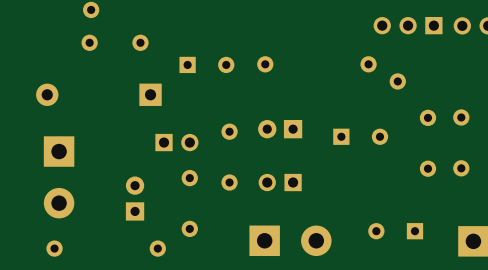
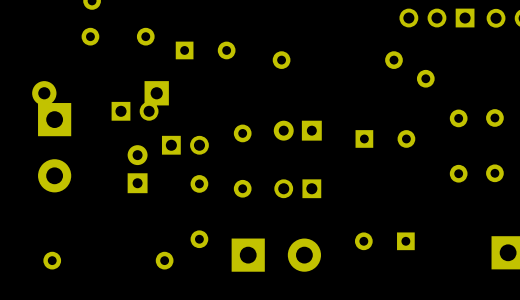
part position: (206, 64) -> (205, 50)
part: none -> (135, 111)
part position: (59, 177) -> (54, 147)
part position: (135, 198) -> (137, 169)
part position: (395, 231) -> (384, 241)
part position: (290, 240) -> (276, 255)

